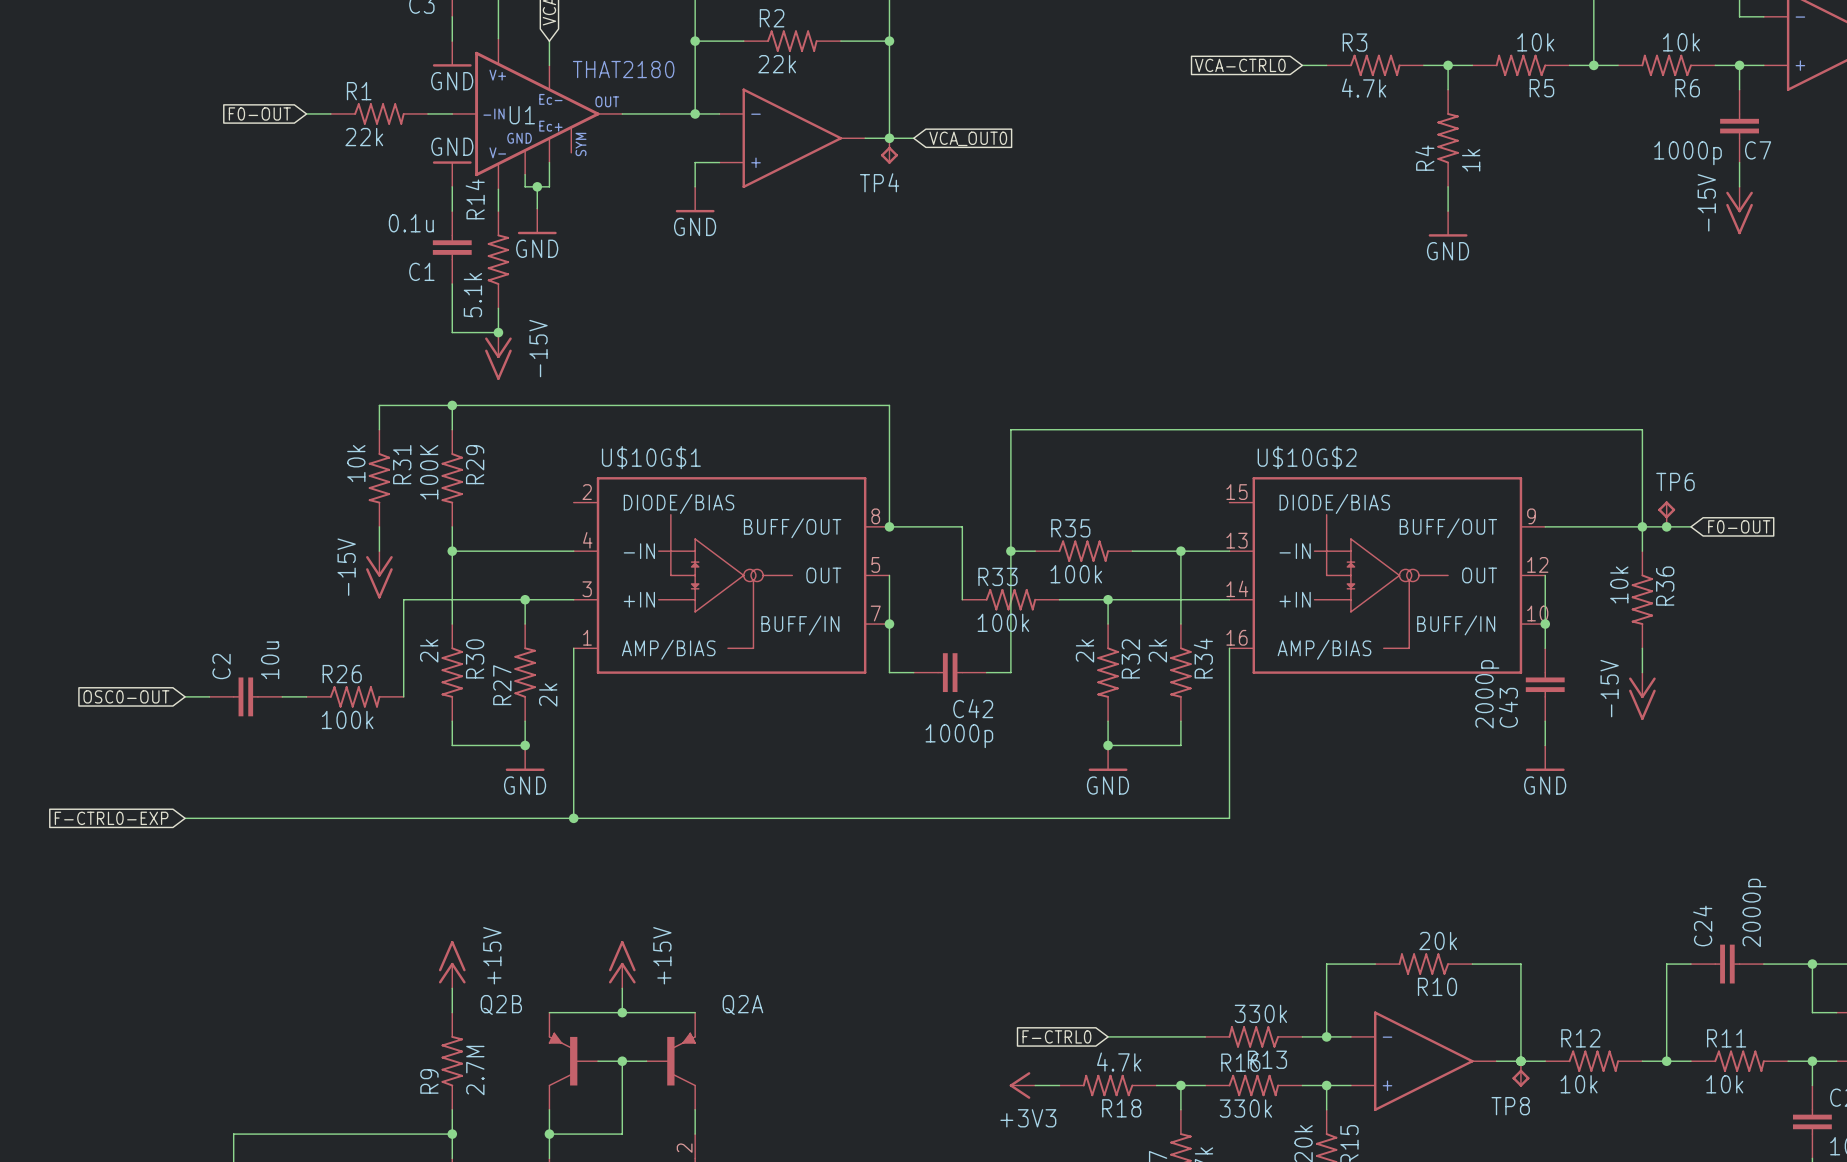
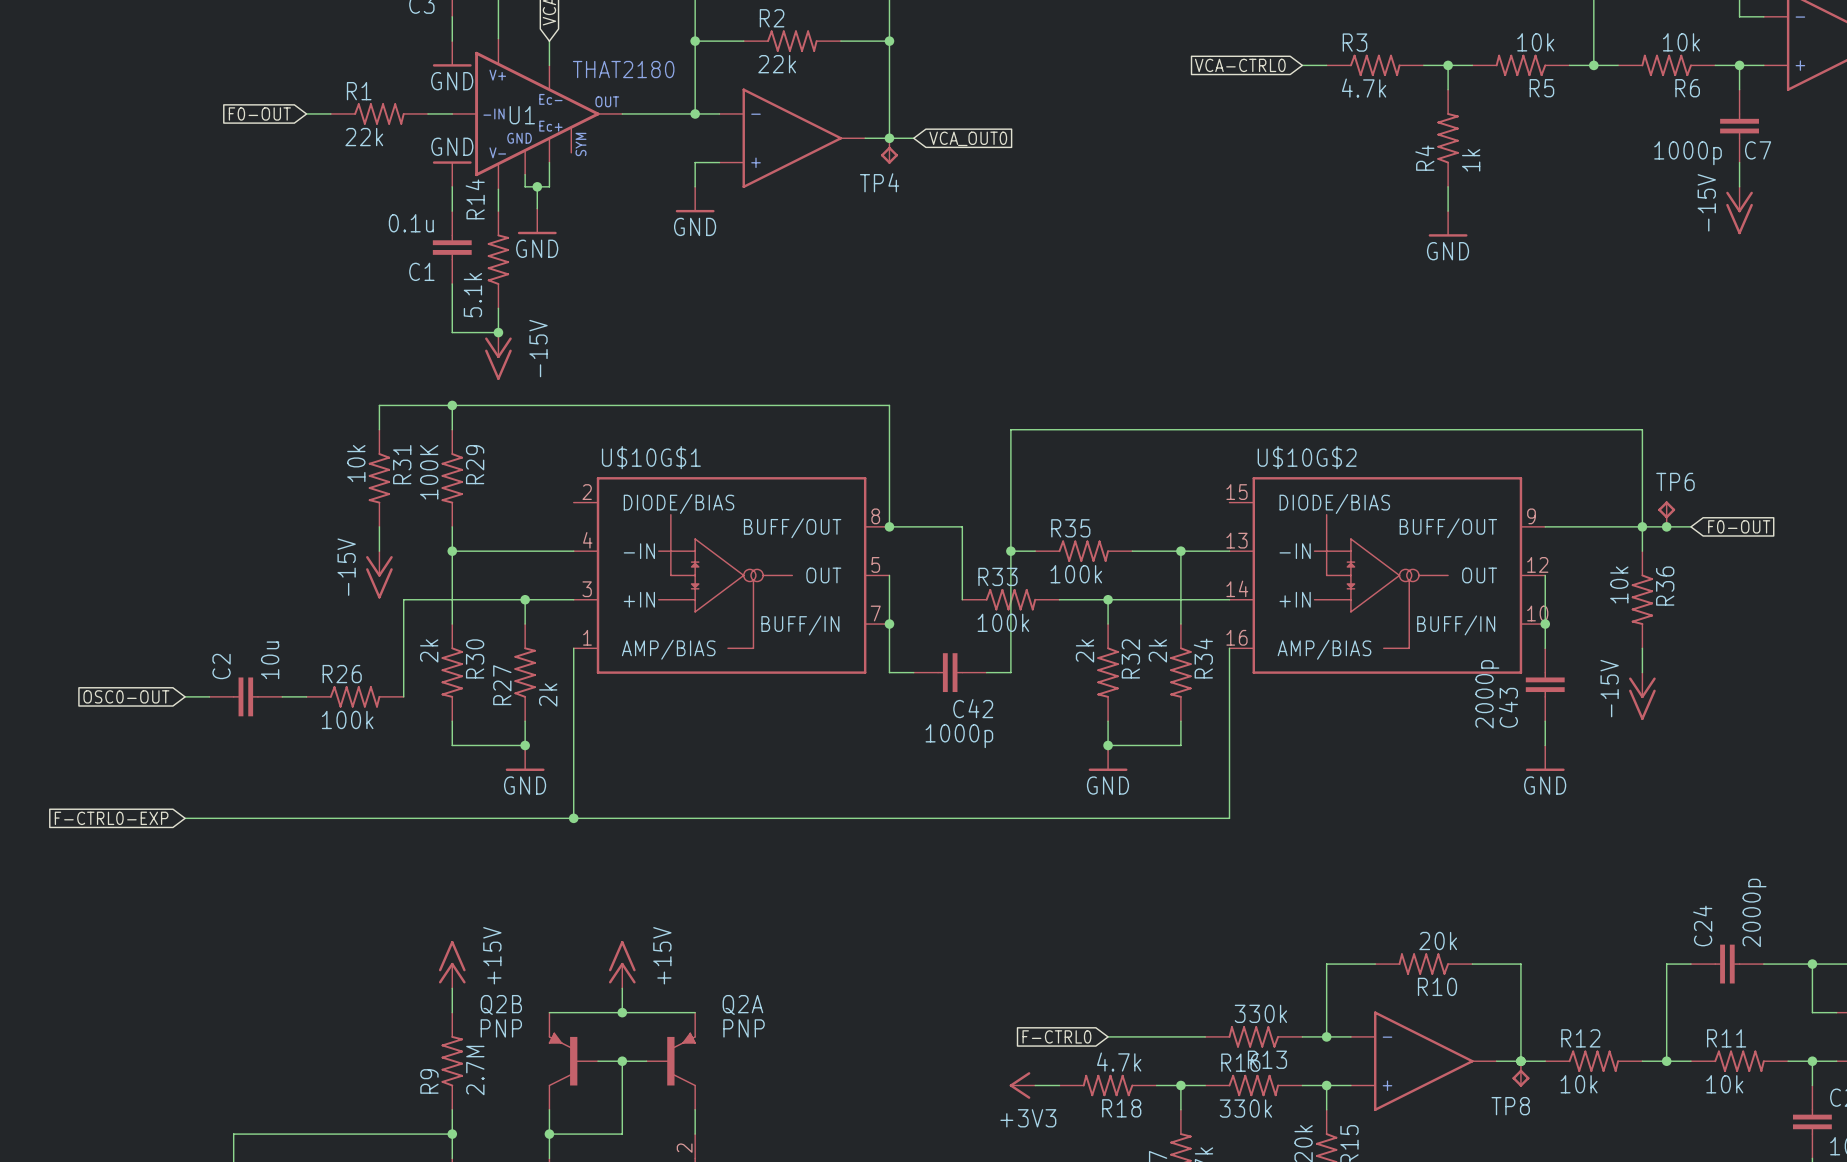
Q2B value: none -> PNP (501, 1028)
Q2A value: none -> PNP (744, 1028)

